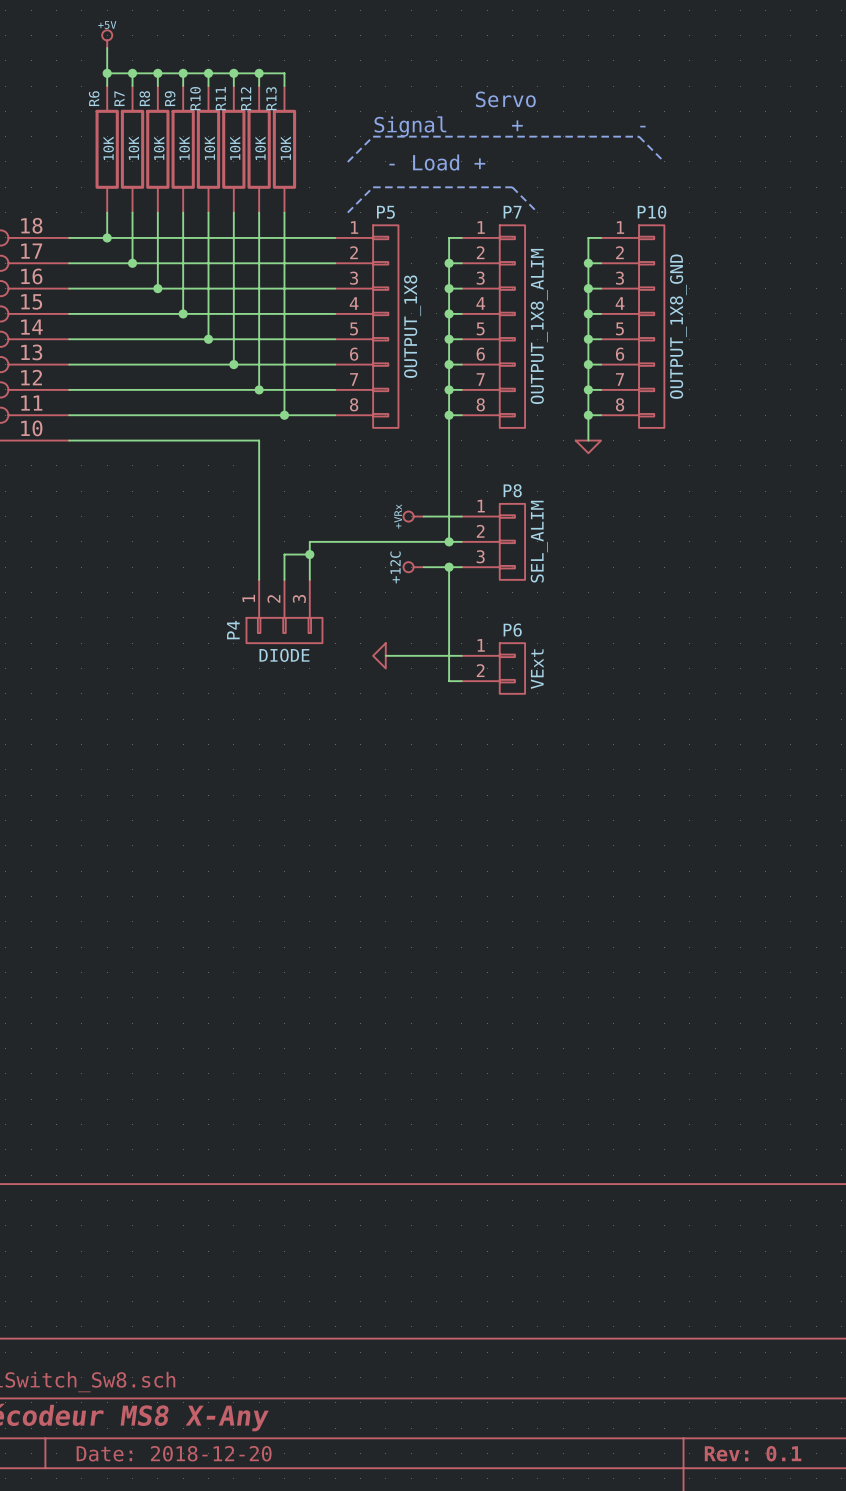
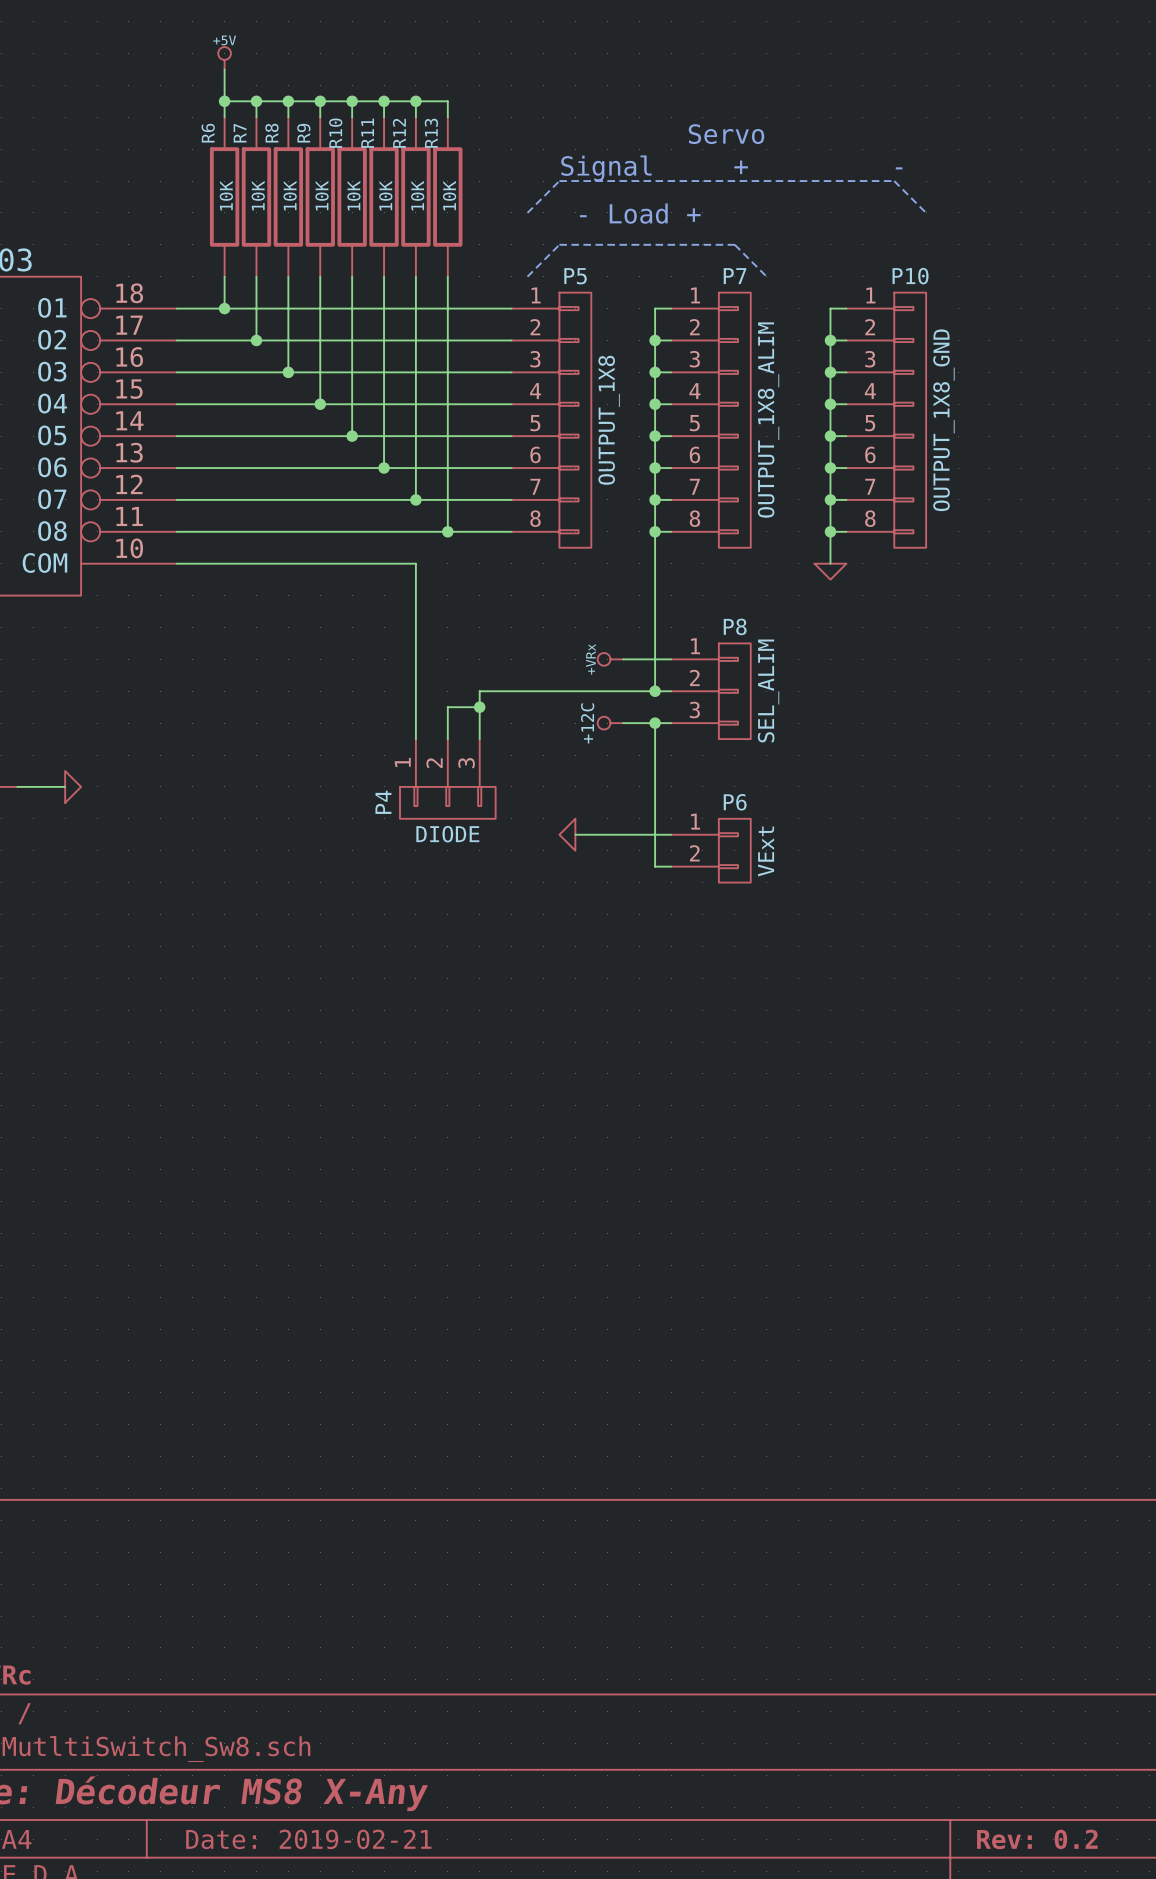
title block: Date: 2018-12-20 (174, 1453) -> Date: 2019-02-21 (308, 1839)
title block: Rev: 0.1 (753, 1453) -> Rev: 0.2 (1037, 1839)

